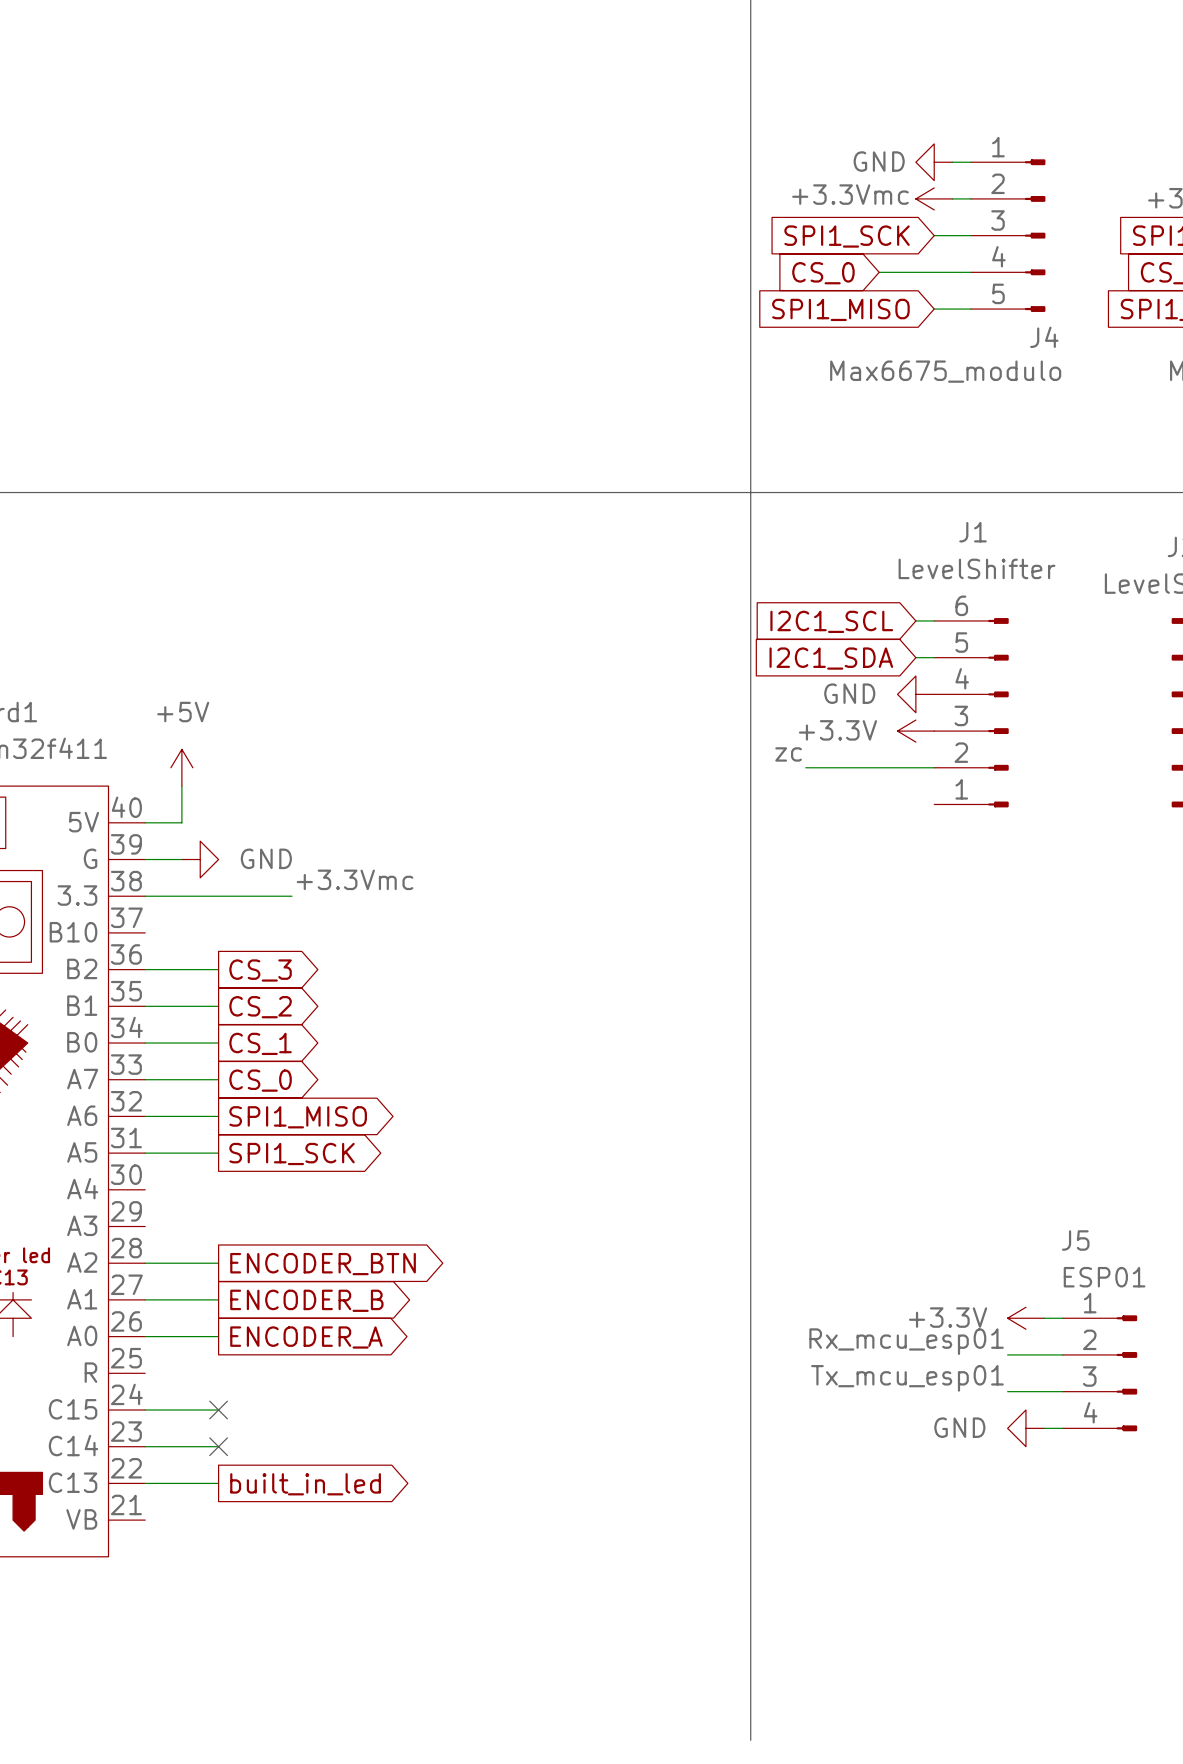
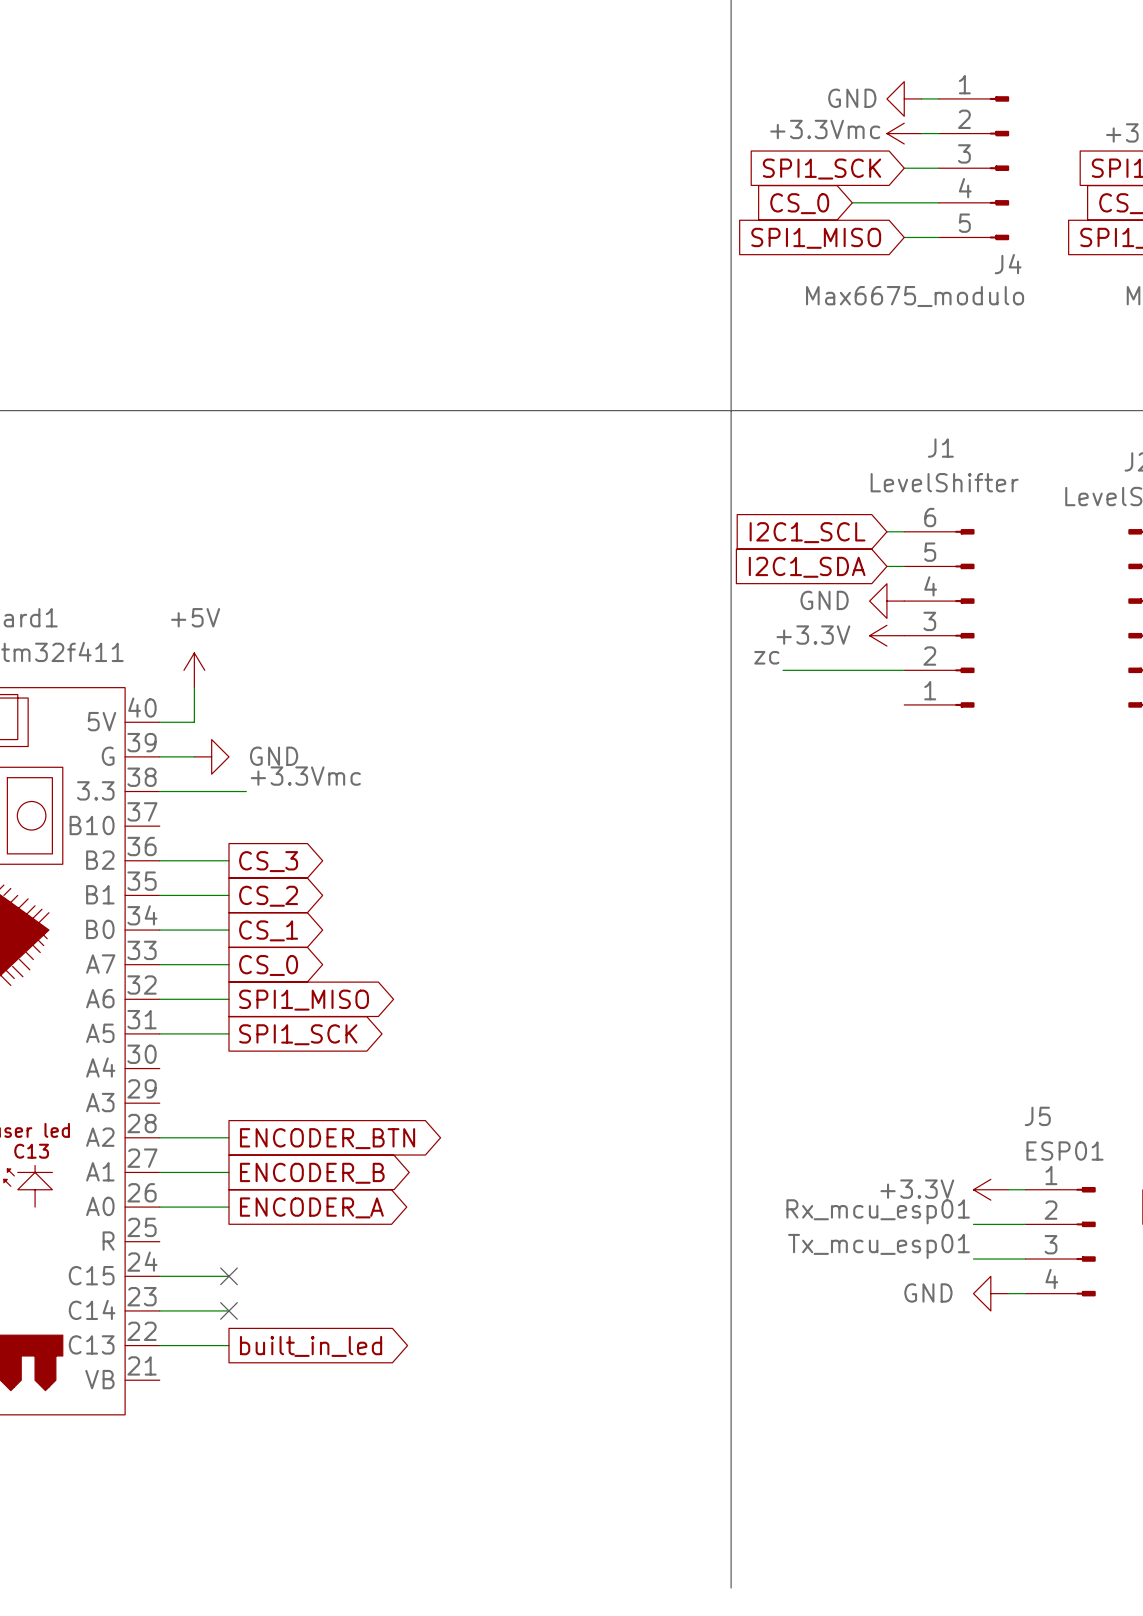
label position: +3.3Vmc (355, 879) -> +3.3Vmc (305, 776)
wire: (236, 896) (291, 896) -> none

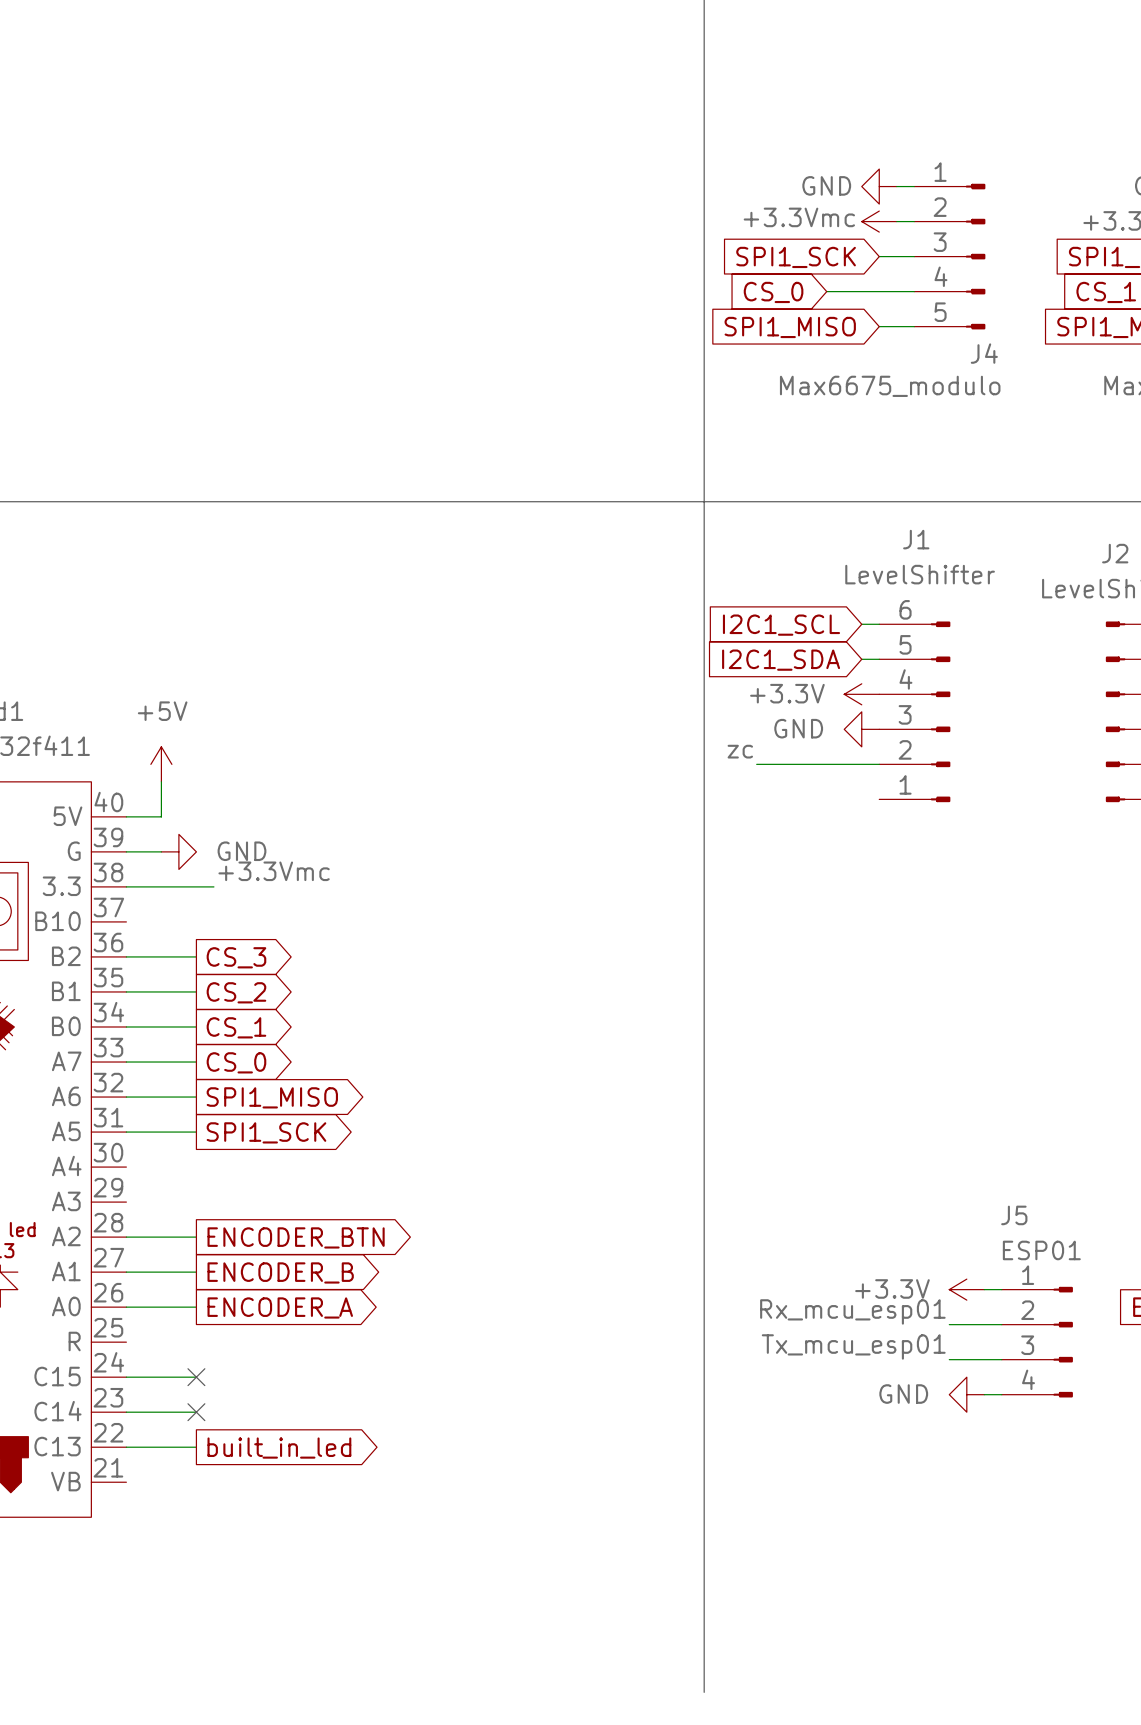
power symbol: GND (886, 601) -> +3.3V (861, 694)
power symbol: +3.3V (886, 635) -> GND (861, 729)

